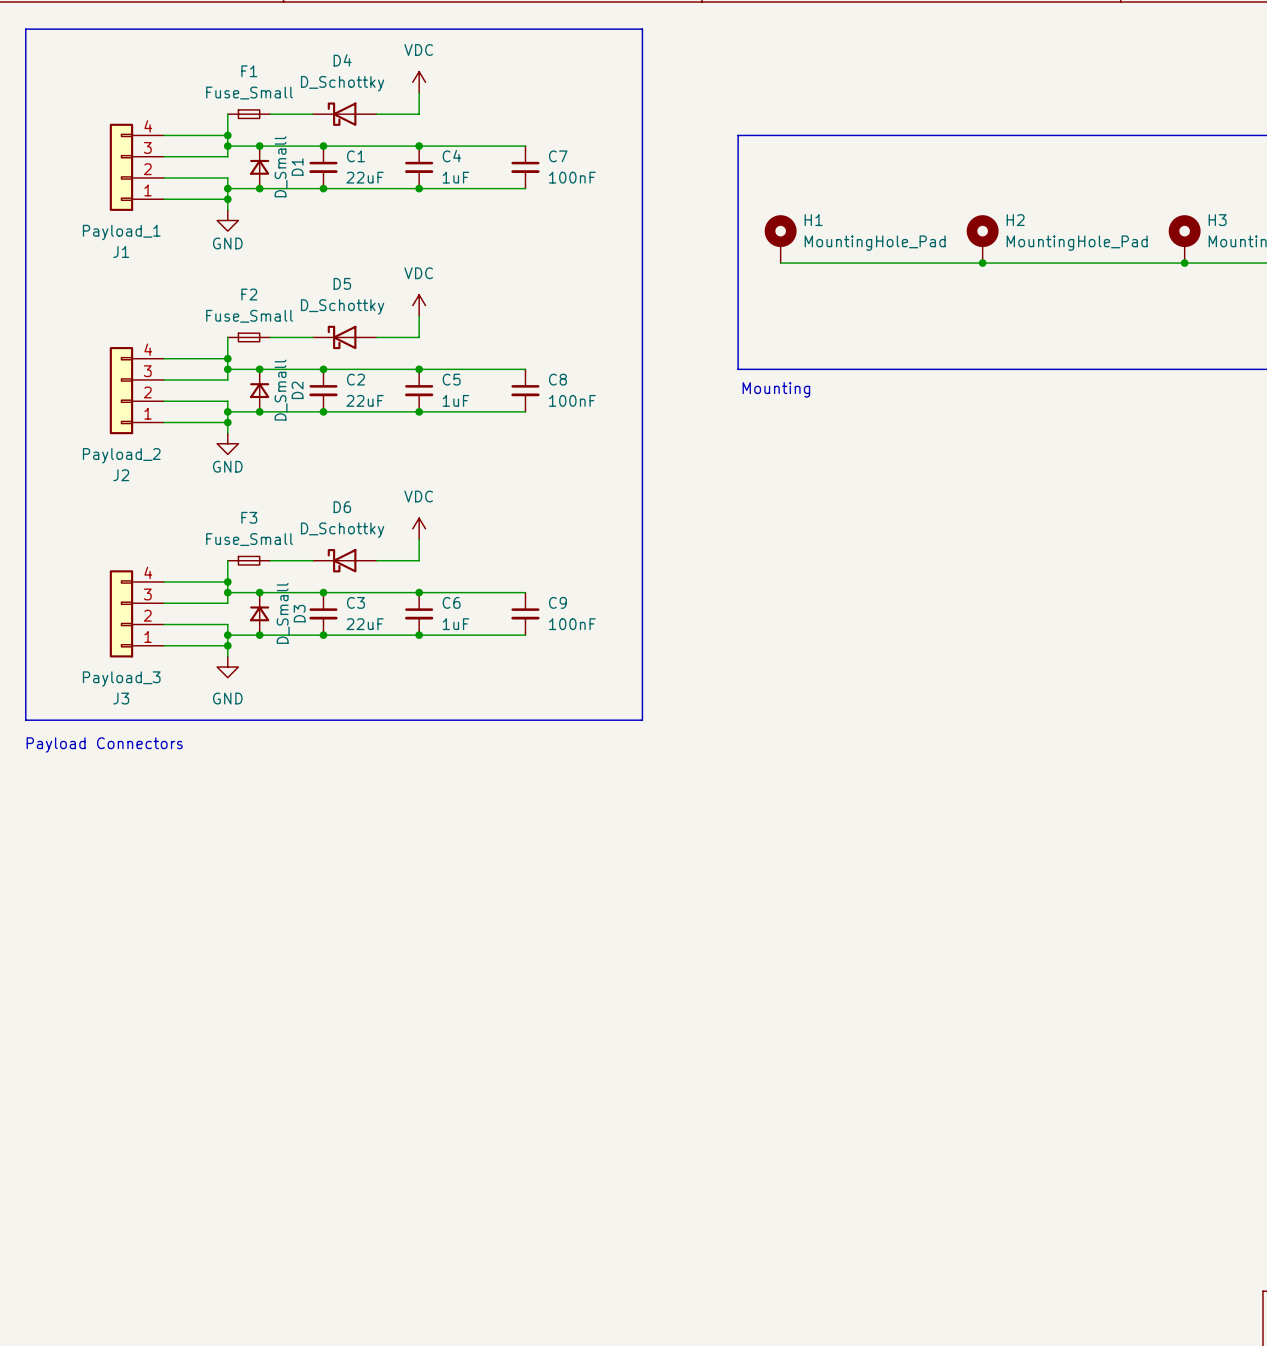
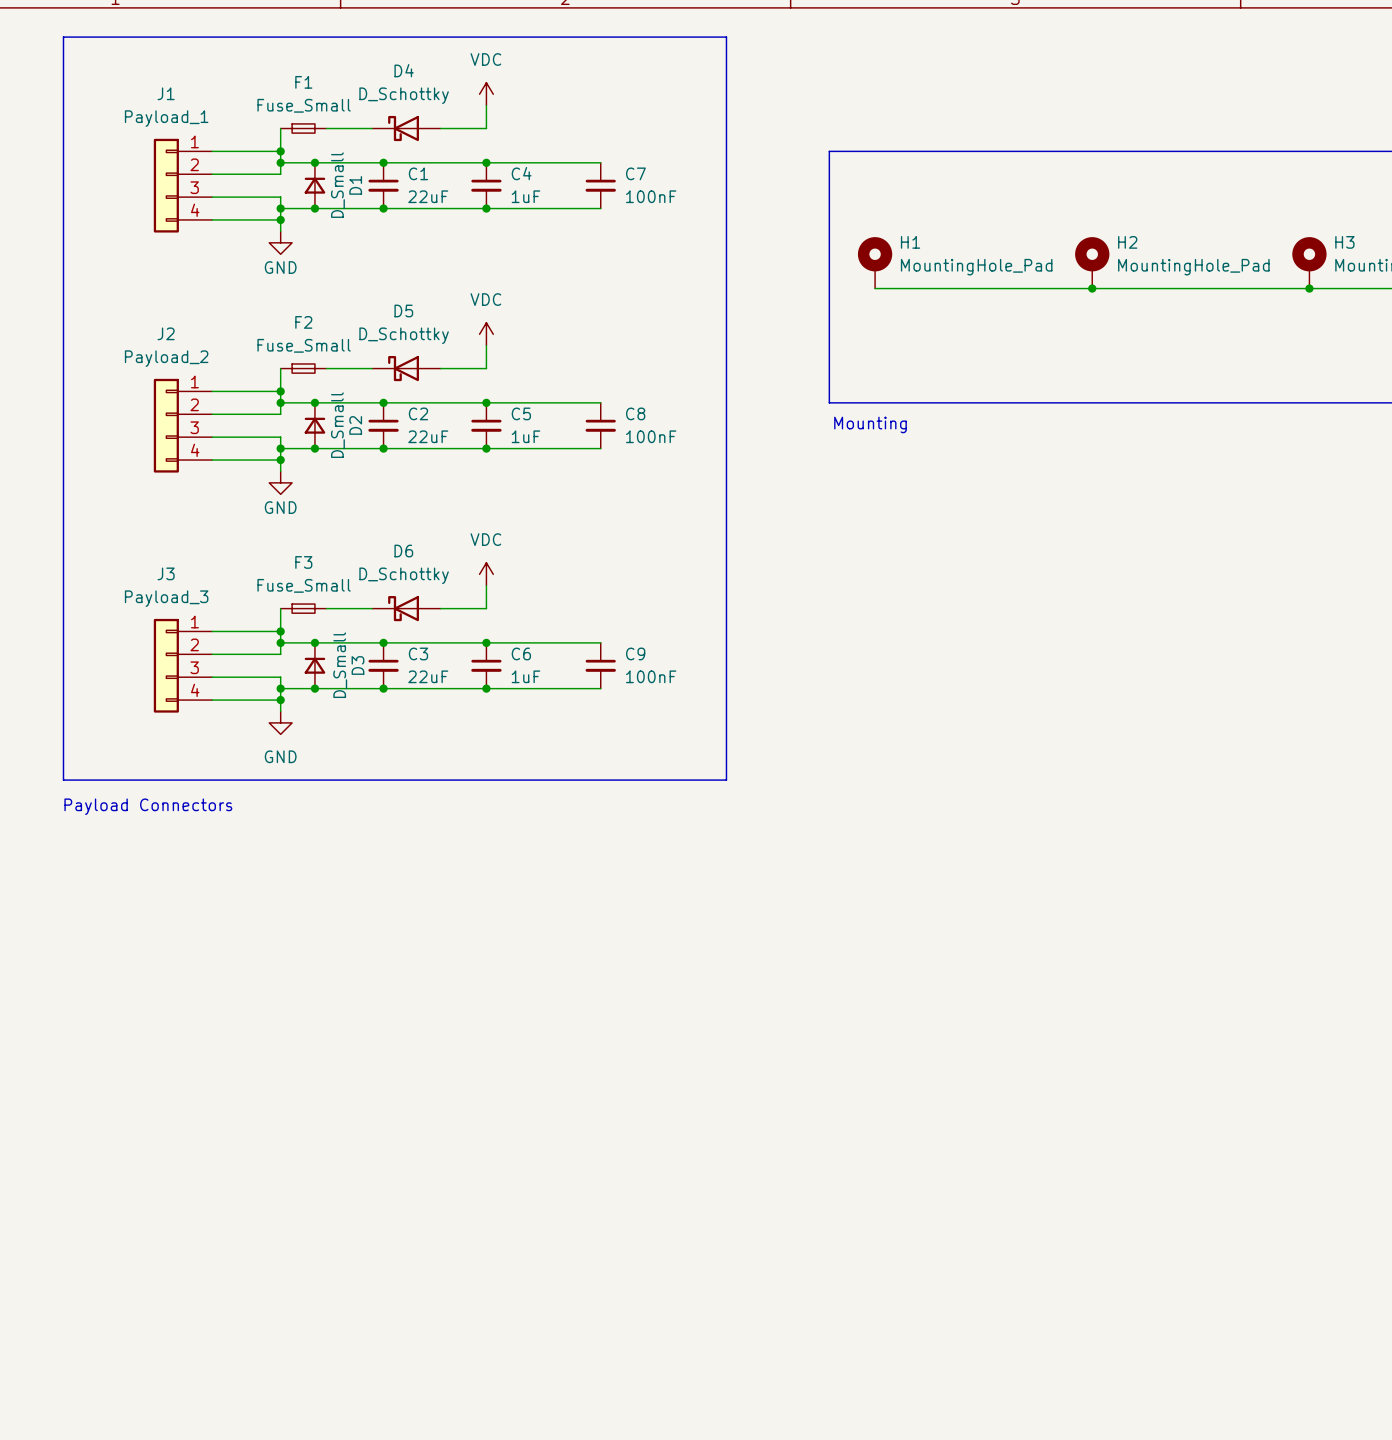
J1 flip: as is (121, 167) -> up-down (166, 185)
J2 flip: as is (121, 390) -> up-down (166, 425)
J3 flip: as is (121, 613) -> up-down (166, 665)

